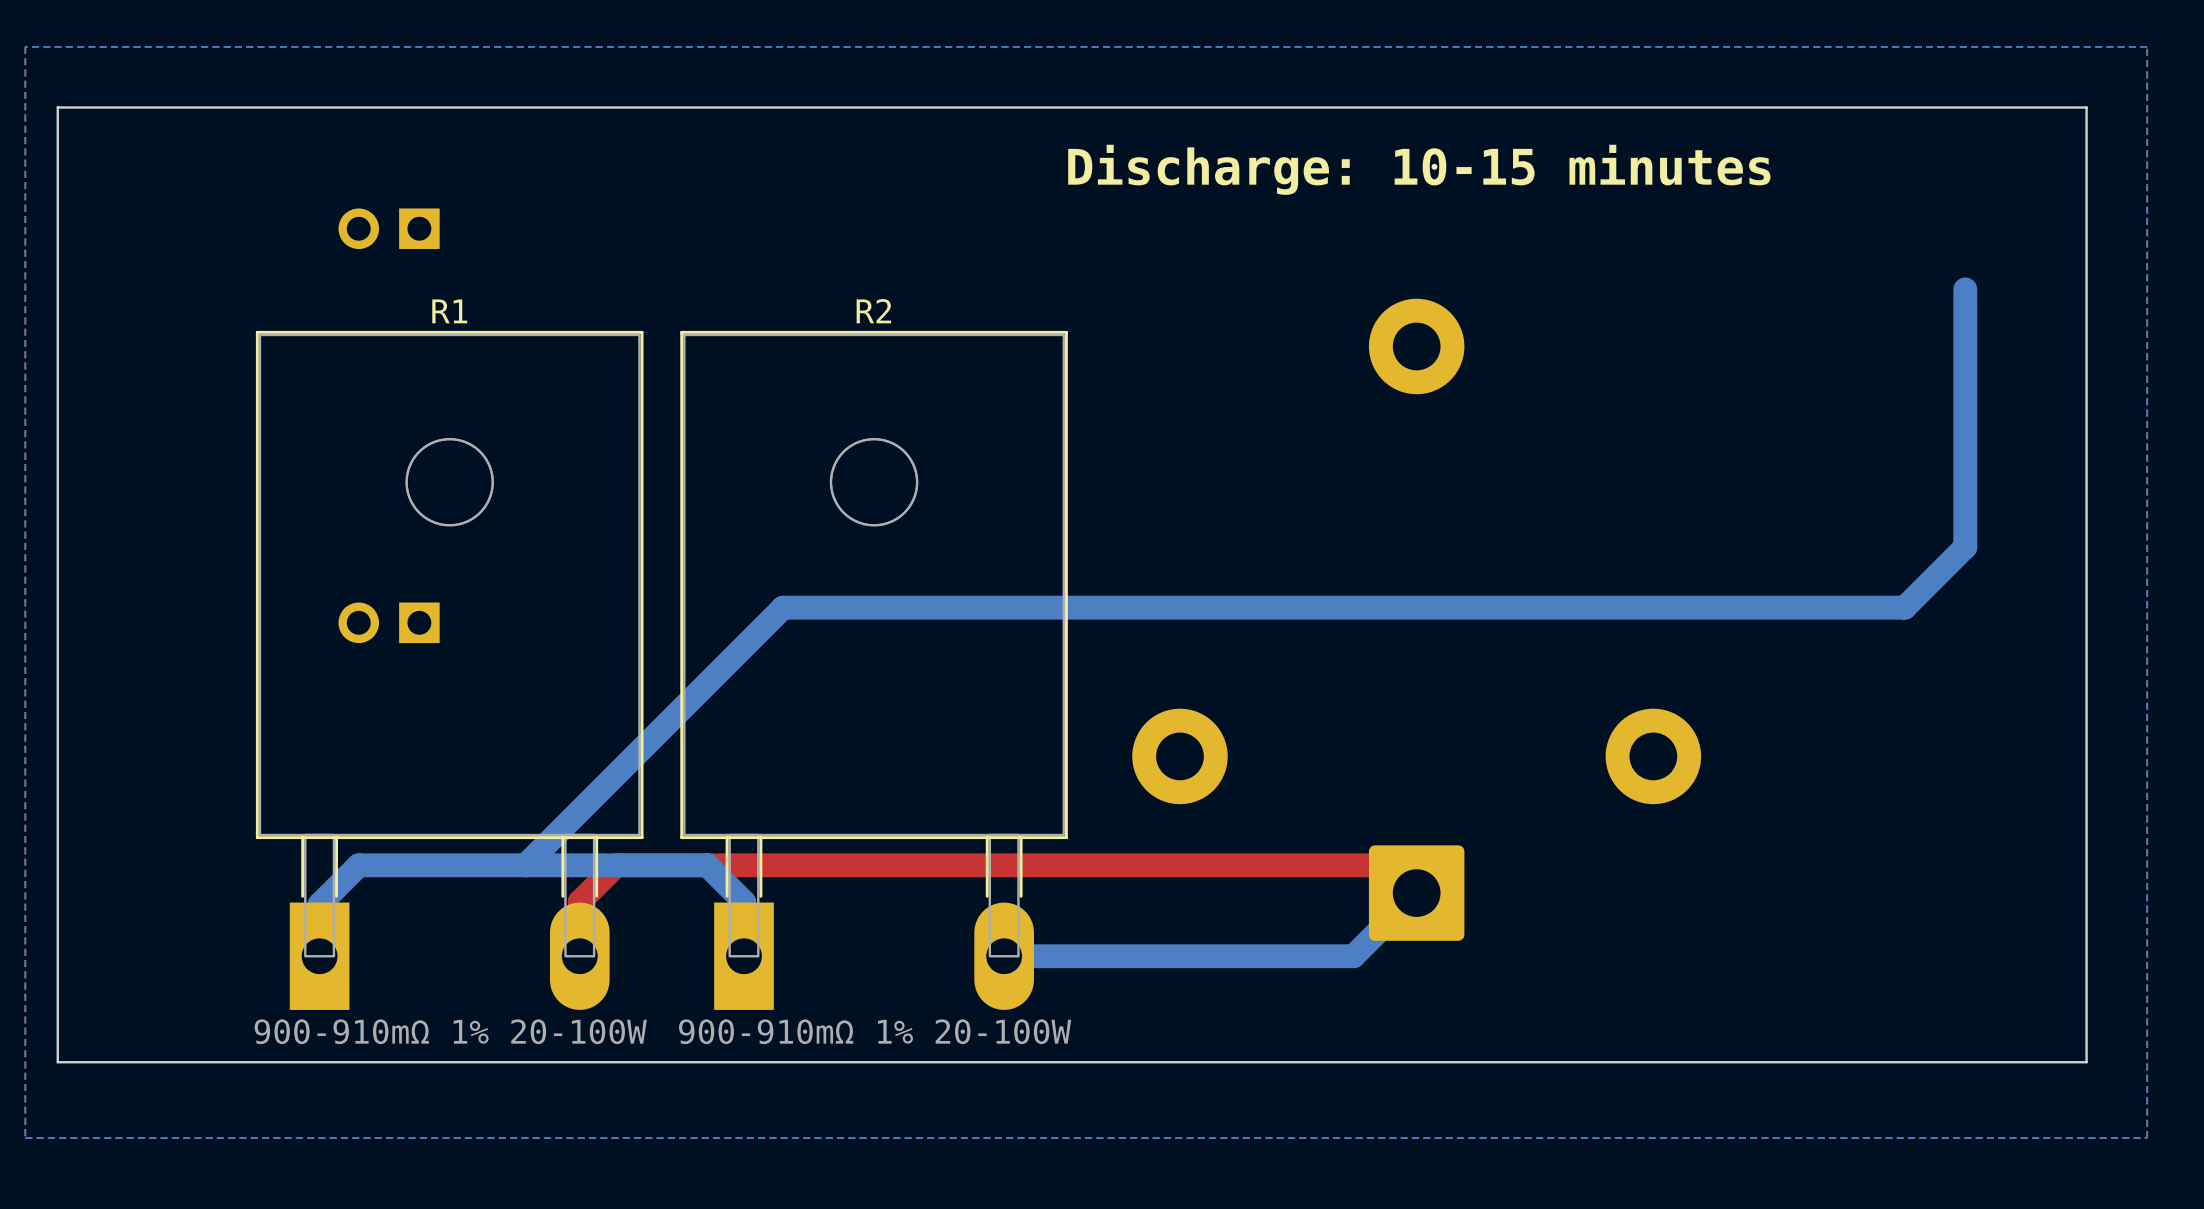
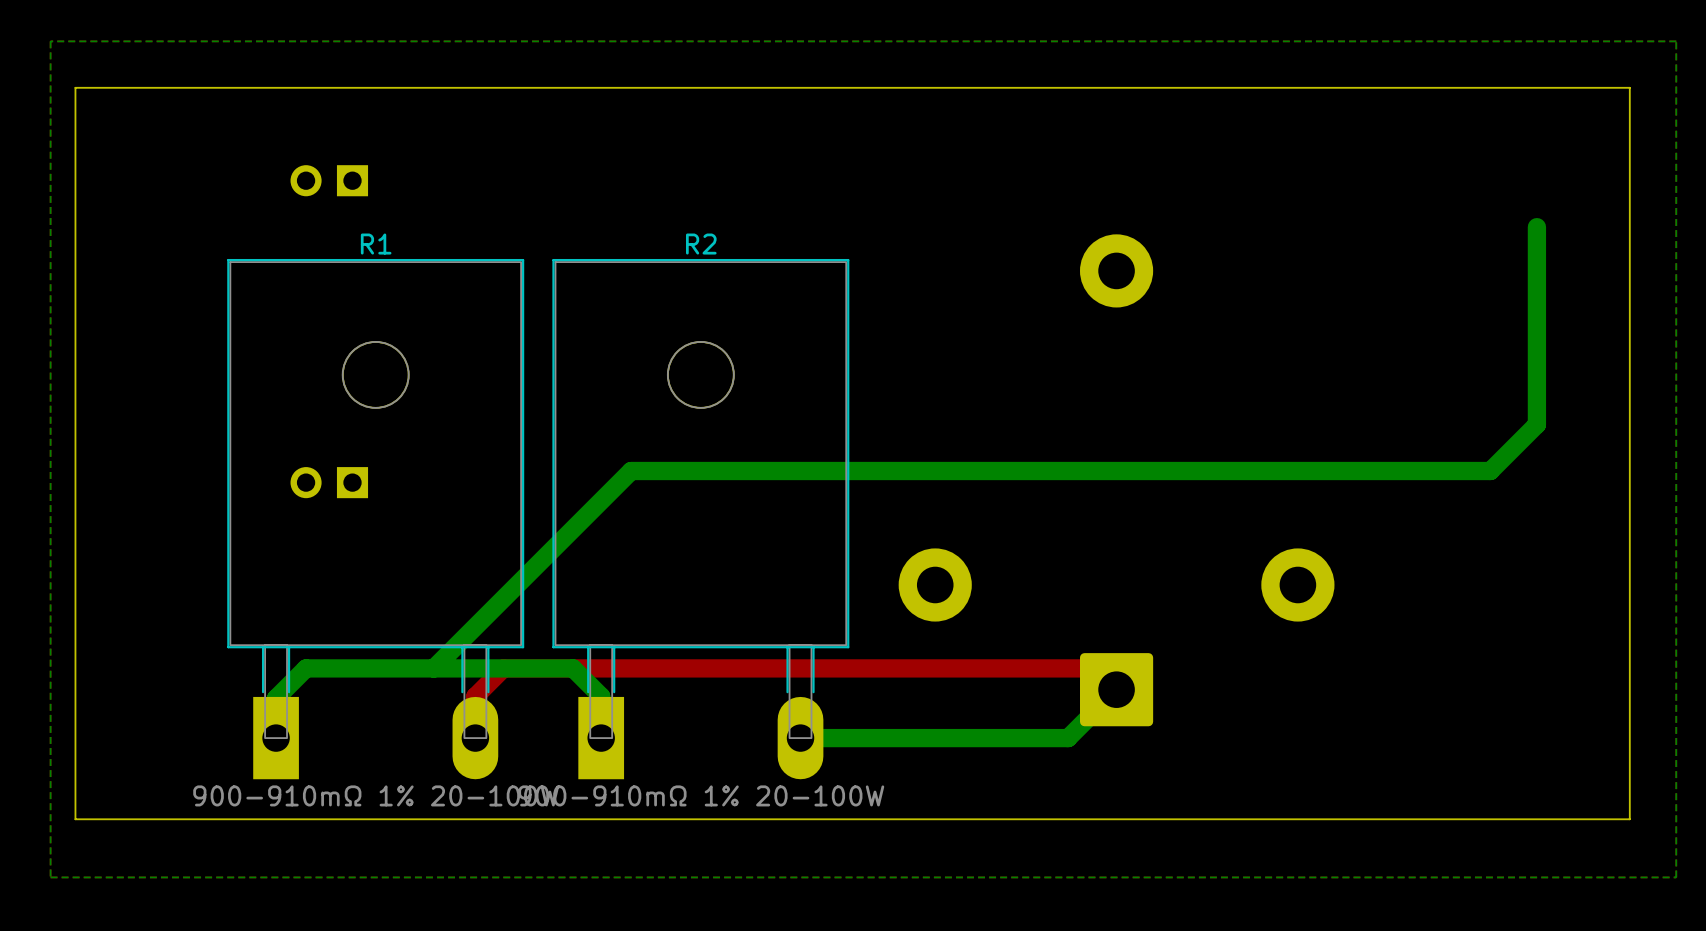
text: Discharge: 10-15 minutes (1419, 169) -> none

